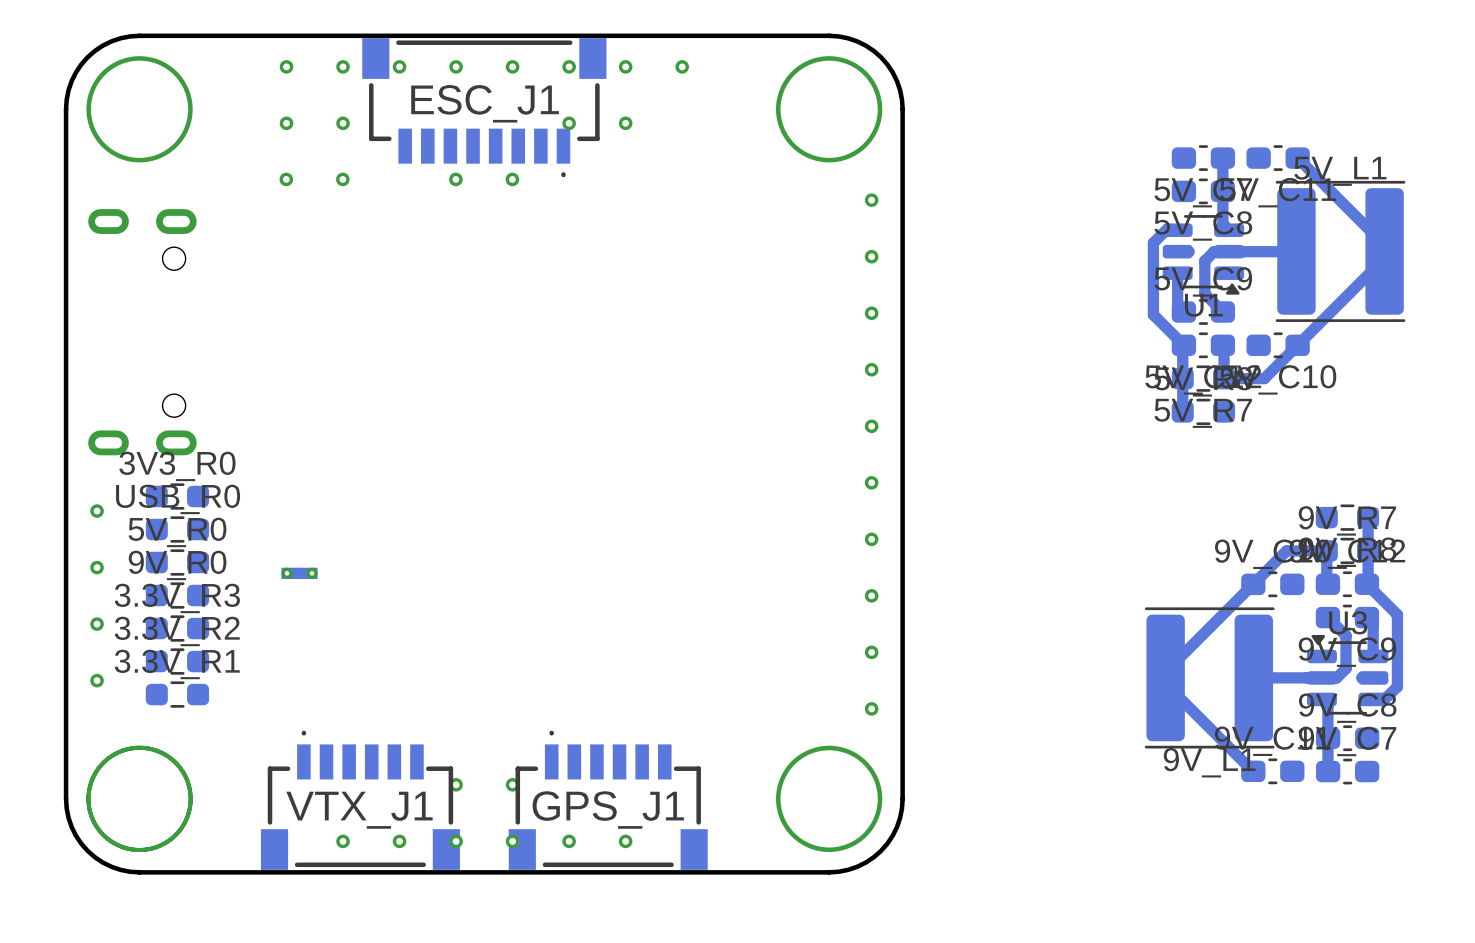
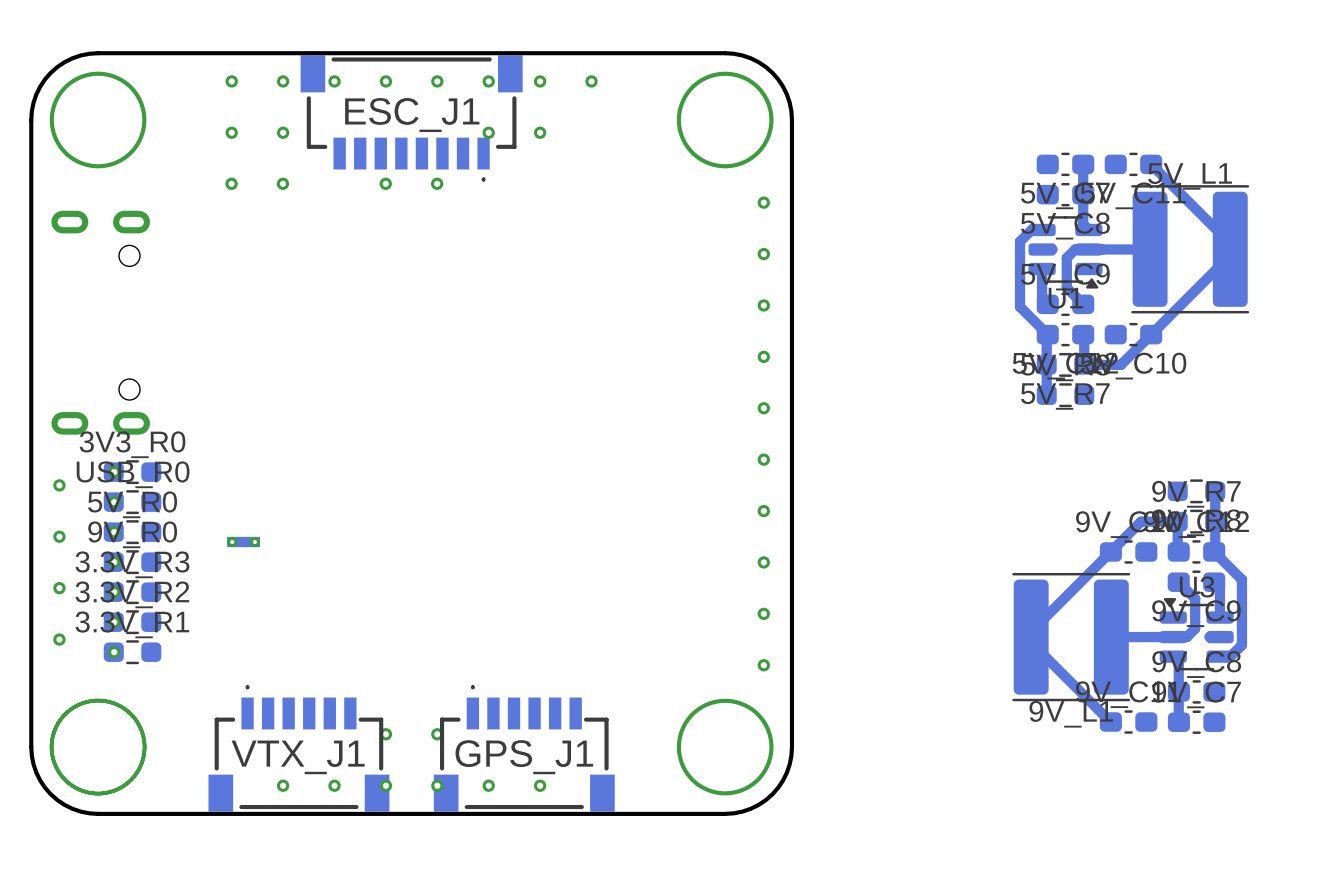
via: none -> (114, 472)
via: none -> (114, 502)
via: none -> (114, 532)
via: none -> (114, 562)
via: none -> (114, 592)
via: none -> (114, 622)
via: none -> (114, 652)

